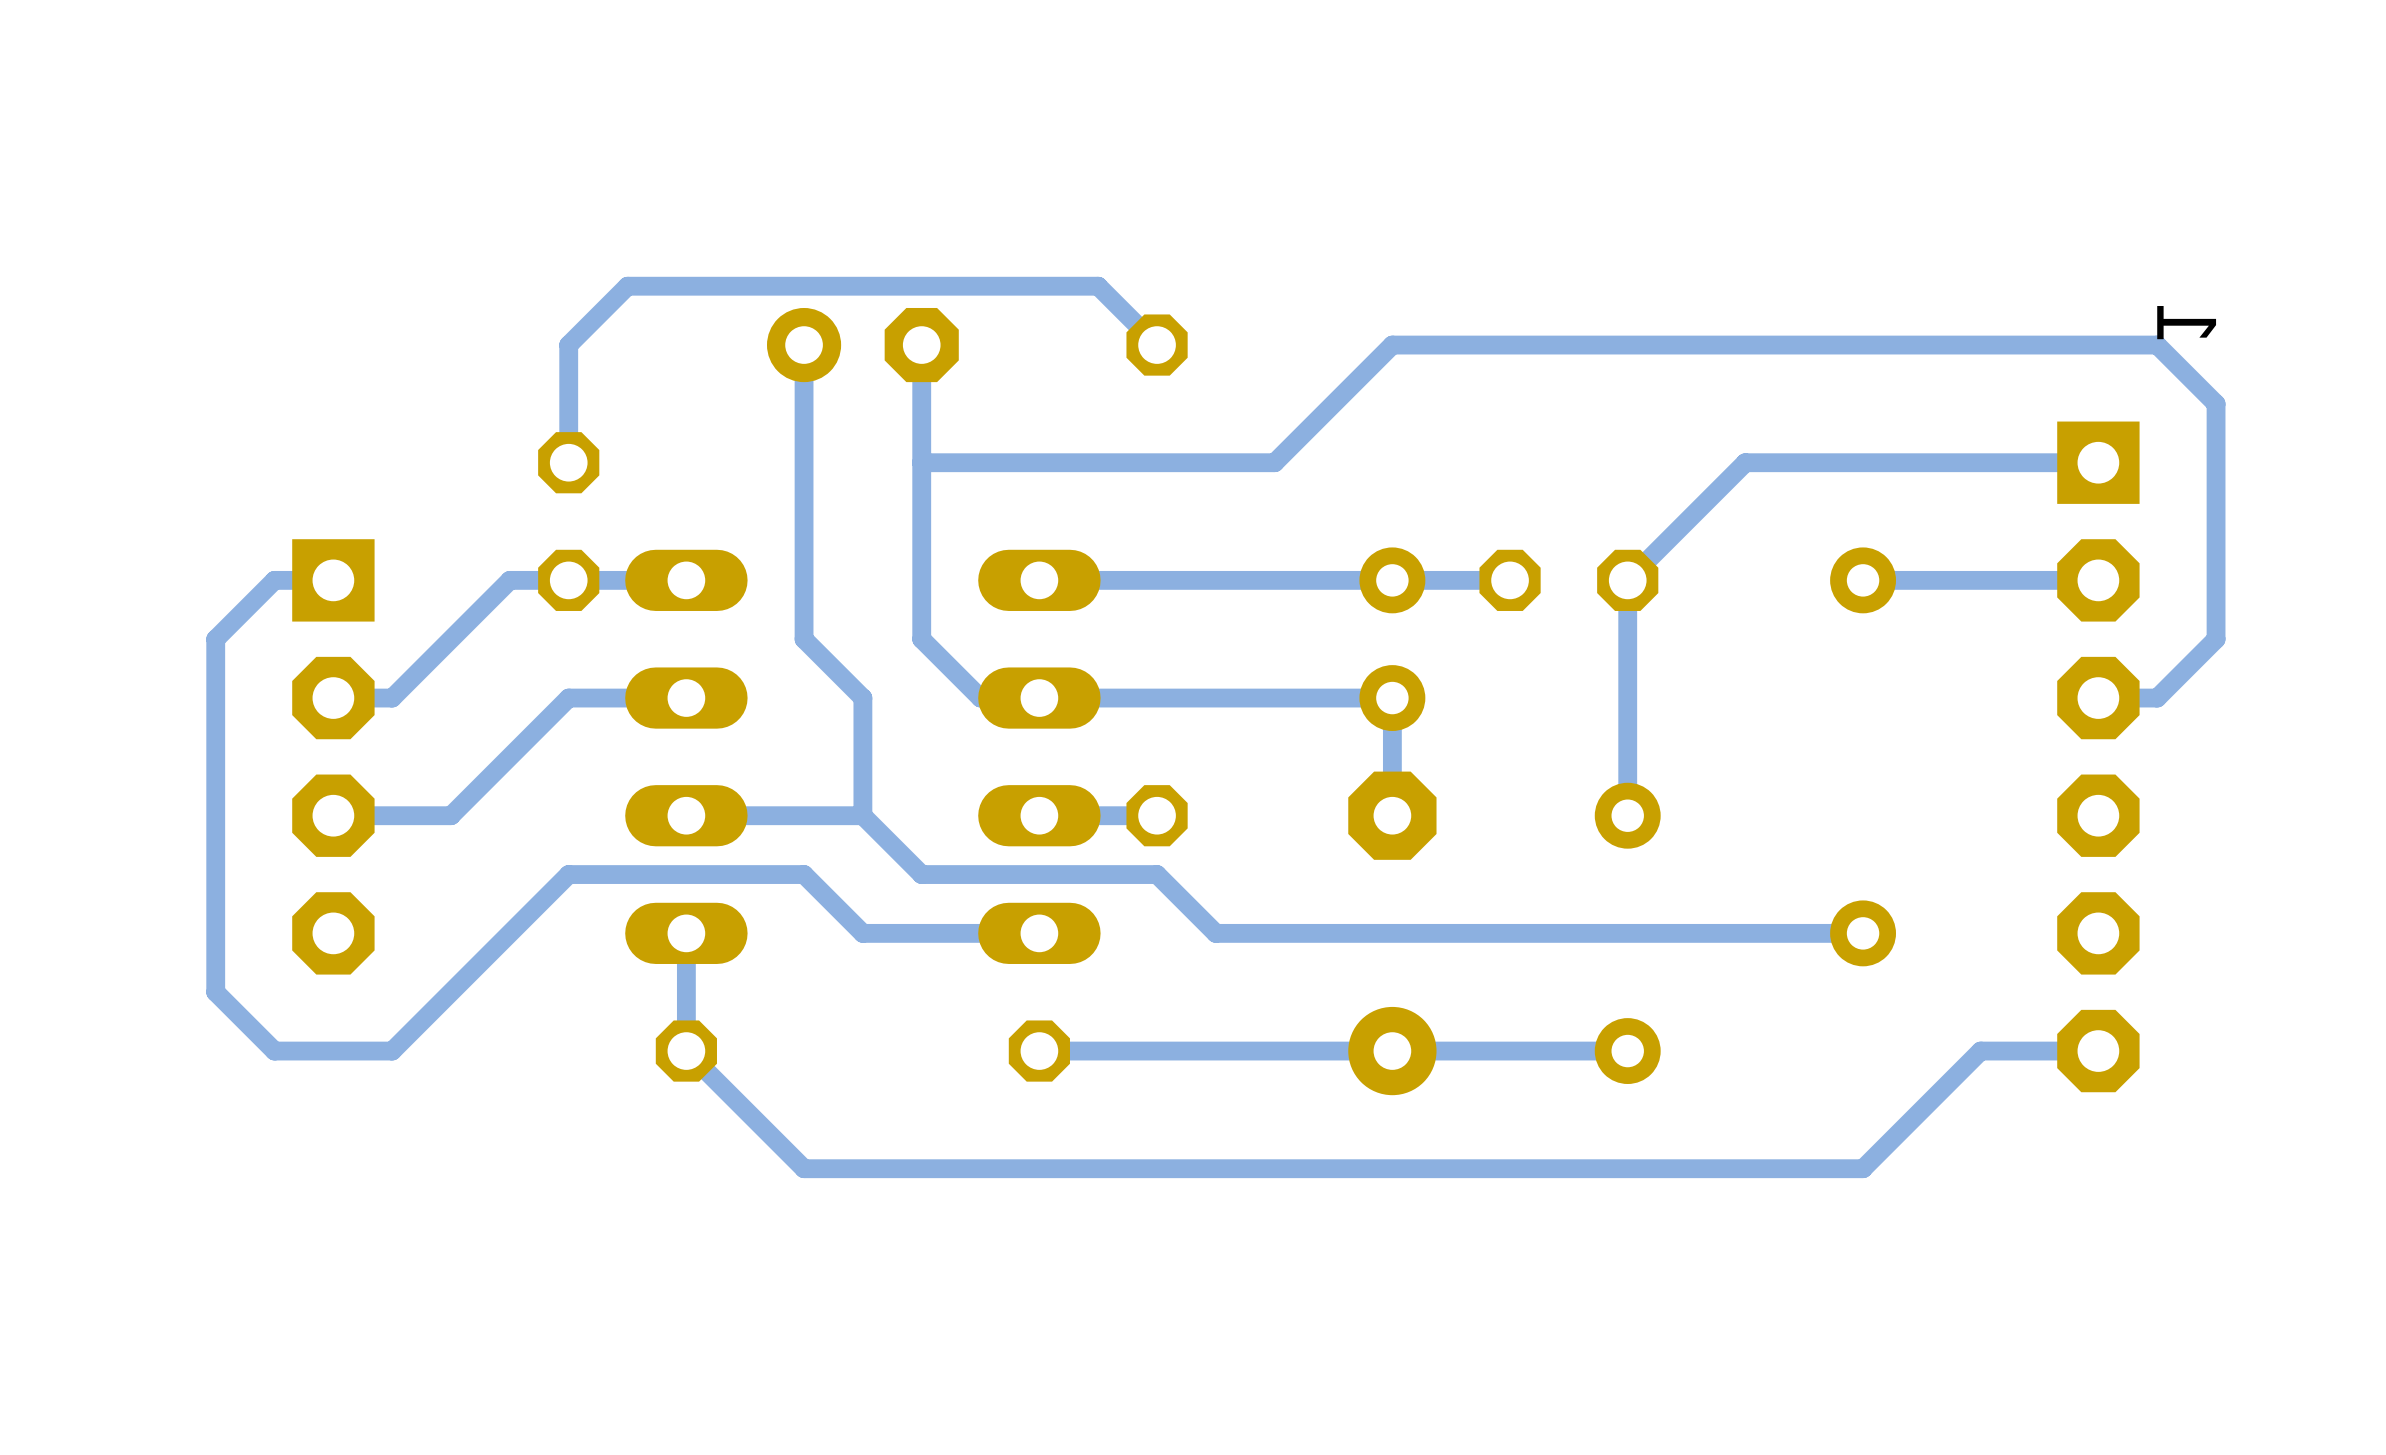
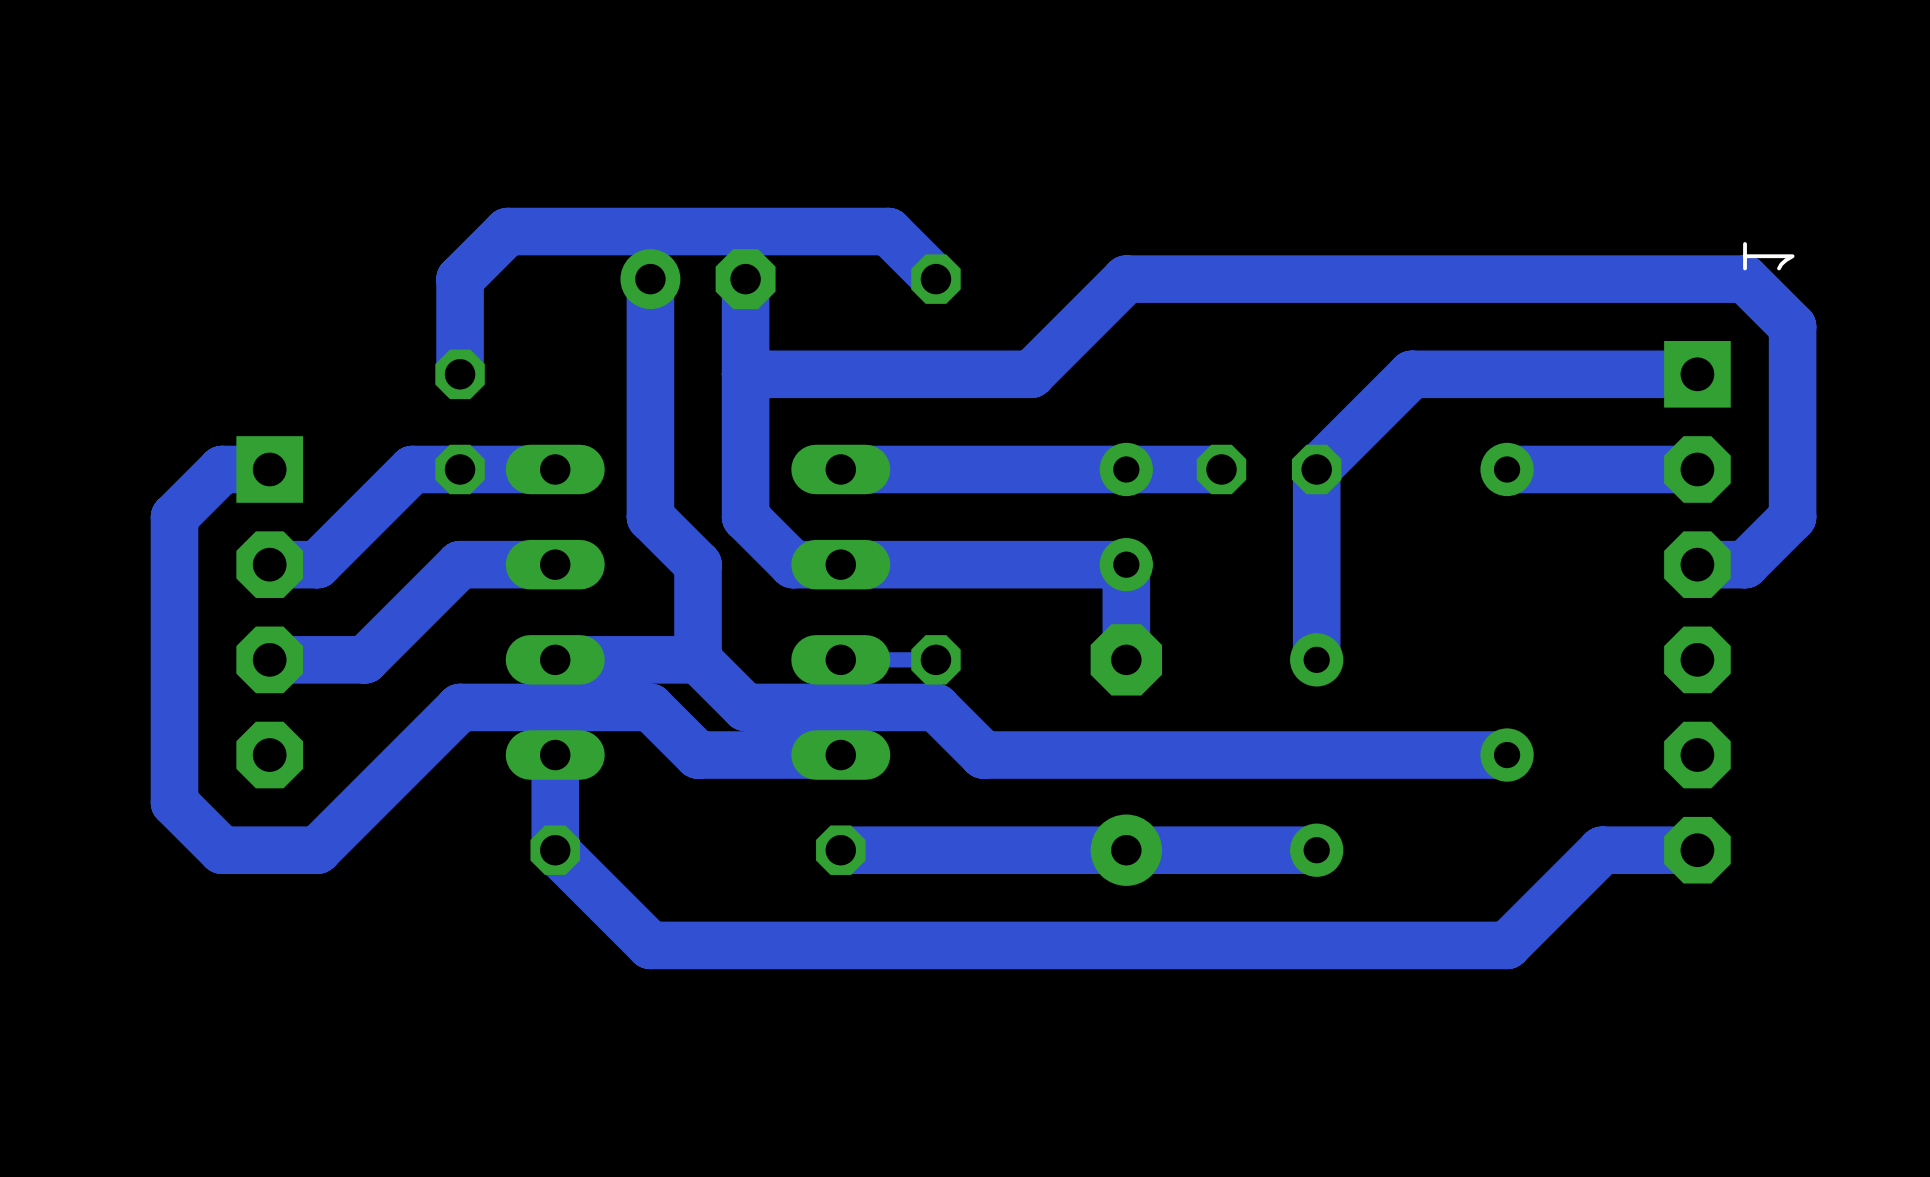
bottom track width: thin (804, 345) (804, 639) (862, 698) (862, 815) -> thick (650, 279) (650, 517) (698, 564) (698, 659)
bottom track width: thin (921, 345) (921, 639) (980, 698) (1392, 698) (1392, 815) -> thick (745, 279) (745, 517) (793, 564) (1126, 564) (1126, 659)
bottom track width: thin (1157, 345) (1098, 286) (627, 286) (568, 345) (568, 462) -> thick (935, 279) (888, 231) (507, 231) (460, 279) (460, 374)
bottom track width: thin (921, 462) (1274, 462) (1392, 345) (2157, 345) (2216, 403) (2216, 639) (2157, 698) (2098, 698) -> thick (745, 374) (1031, 374) (1126, 279) (1745, 279) (1792, 326) (1792, 517) (1745, 564) (1697, 564)
bottom track width: thin (2098, 462) (1745, 462) (1627, 580) (1627, 815) -> thick (1697, 374) (1411, 374) (1316, 469) (1316, 659)
bottom track width: thin (333, 580) (274, 580) (215, 639) (215, 992) (274, 1051) (392, 1051) (568, 874) (804, 874) (862, 933) (1039, 933) -> thick (269, 469) (222, 469) (174, 517) (174, 802) (222, 850) (317, 850) (460, 707) (650, 707) (698, 755) (840, 755)
bottom track width: thin (686, 580) (509, 580) (392, 698) (333, 698) -> thick (555, 469) (412, 469) (317, 564) (269, 564)
bottom track width: thin (1510, 580) (1039, 580) -> thick (1221, 469) (840, 469)
bottom track width: thin (2098, 580) (1863, 580) -> thick (1697, 469) (1507, 469)
bottom track width: thin (686, 698) (568, 698) (451, 815) (333, 815) -> thick (555, 564) (460, 564) (364, 659) (269, 659)
bottom track width: thin (862, 815) (686, 815) -> thick (698, 659) (555, 659)
bottom track width: thin (862, 815) (921, 874) (1157, 874) (1215, 933) (1863, 933) -> thick (698, 659) (745, 707) (935, 707) (983, 755) (1507, 755)
bottom track width: thin (686, 933) (686, 1051) (804, 1168) (1863, 1168) (1980, 1051) (2098, 1051) -> thick (555, 755) (555, 850) (650, 945) (1507, 945) (1602, 850) (1697, 850)
bottom track width: thin (1627, 1051) (1039, 1051) -> thick (1316, 850) (840, 850)

